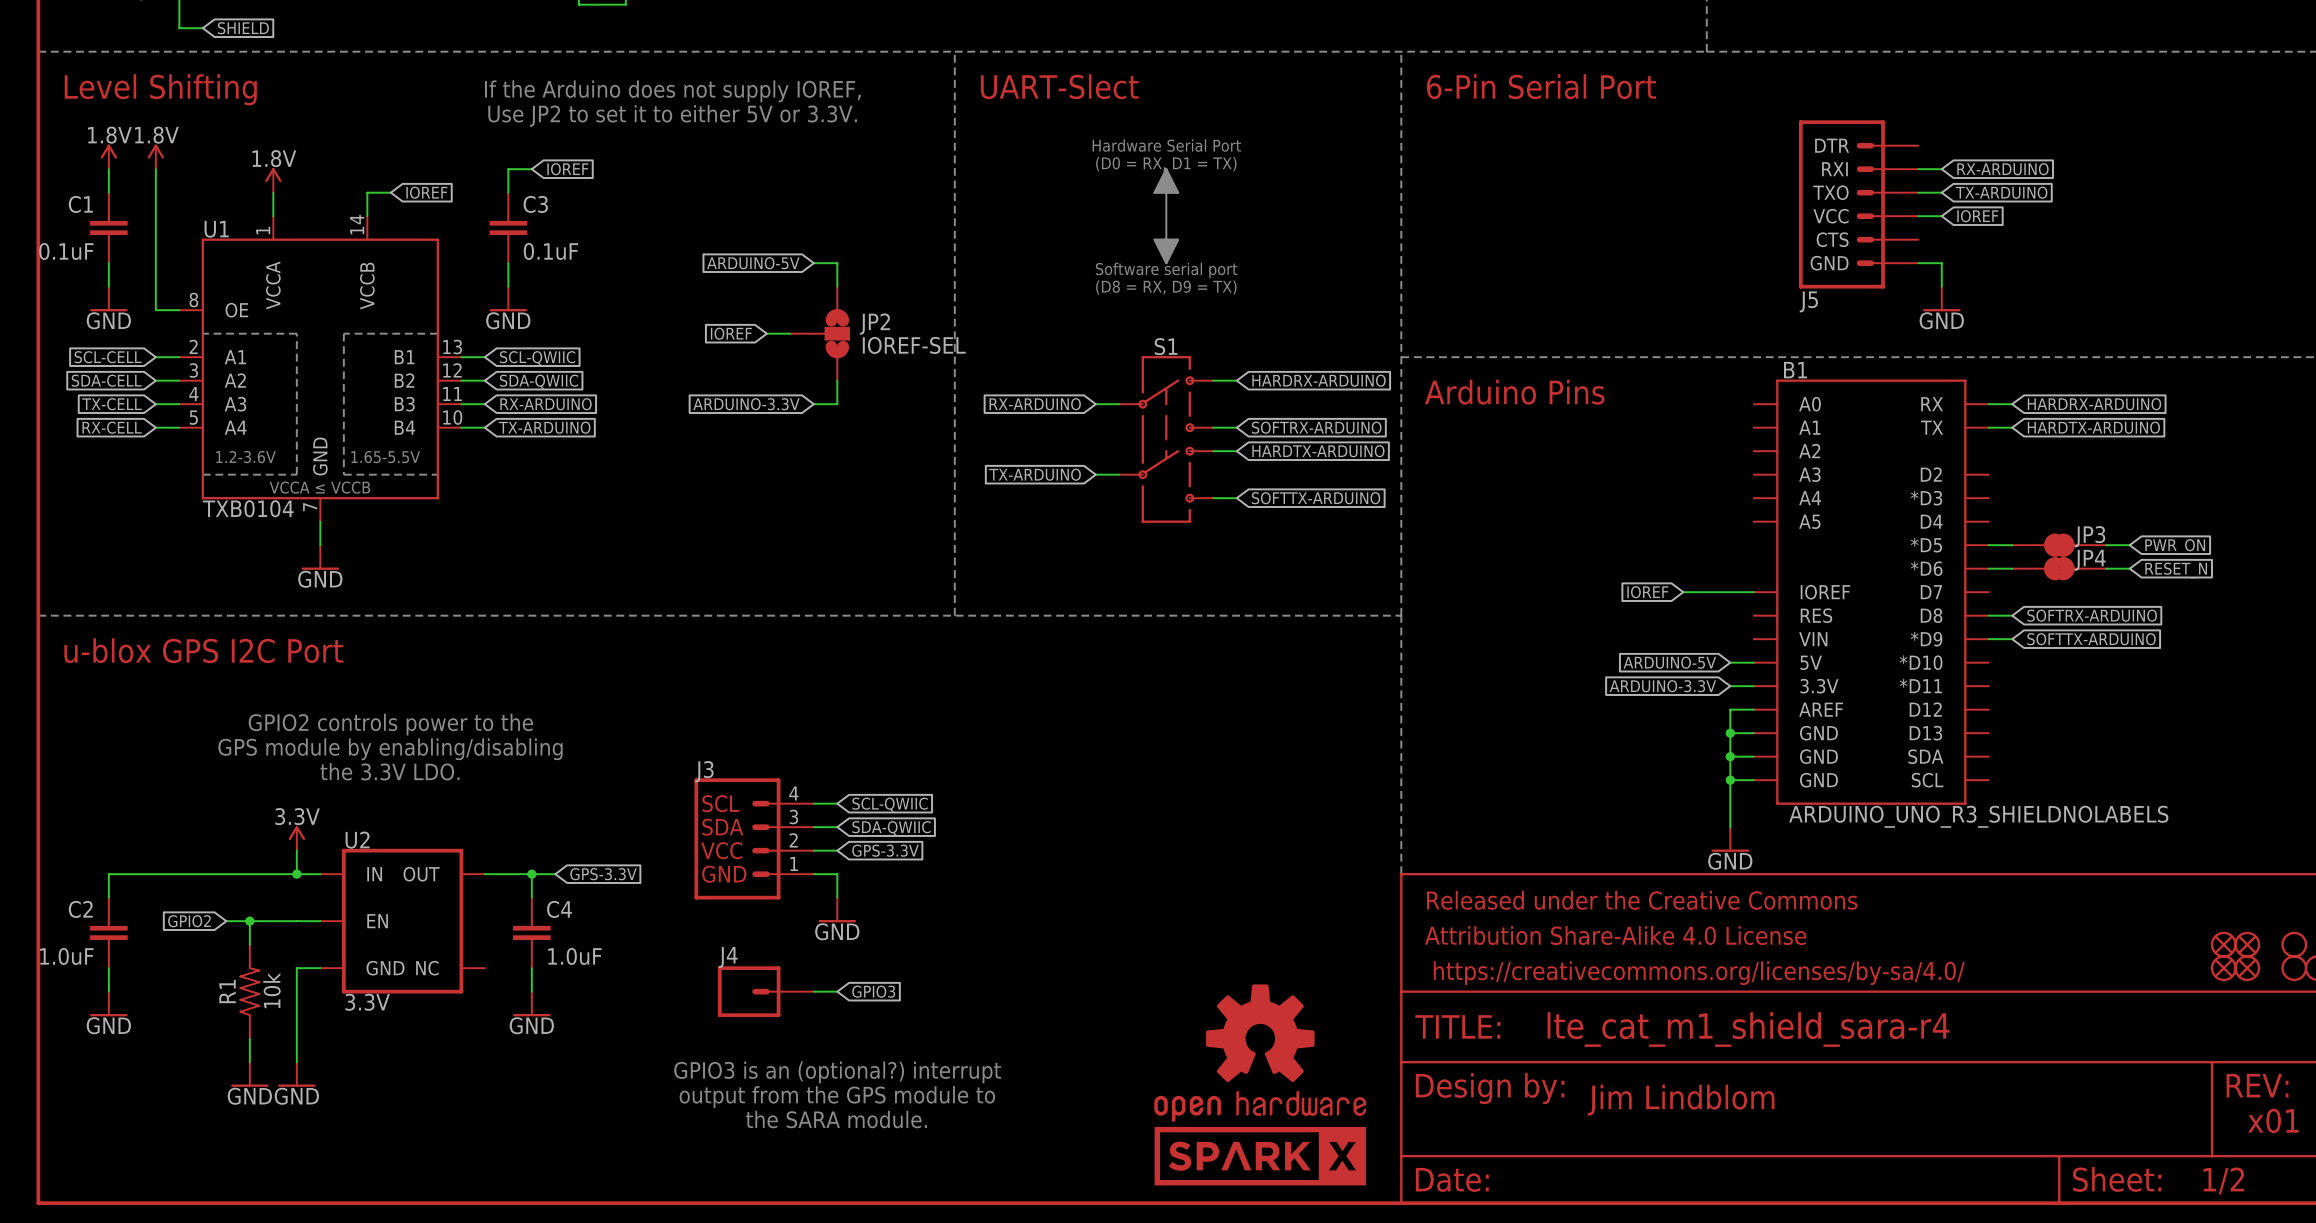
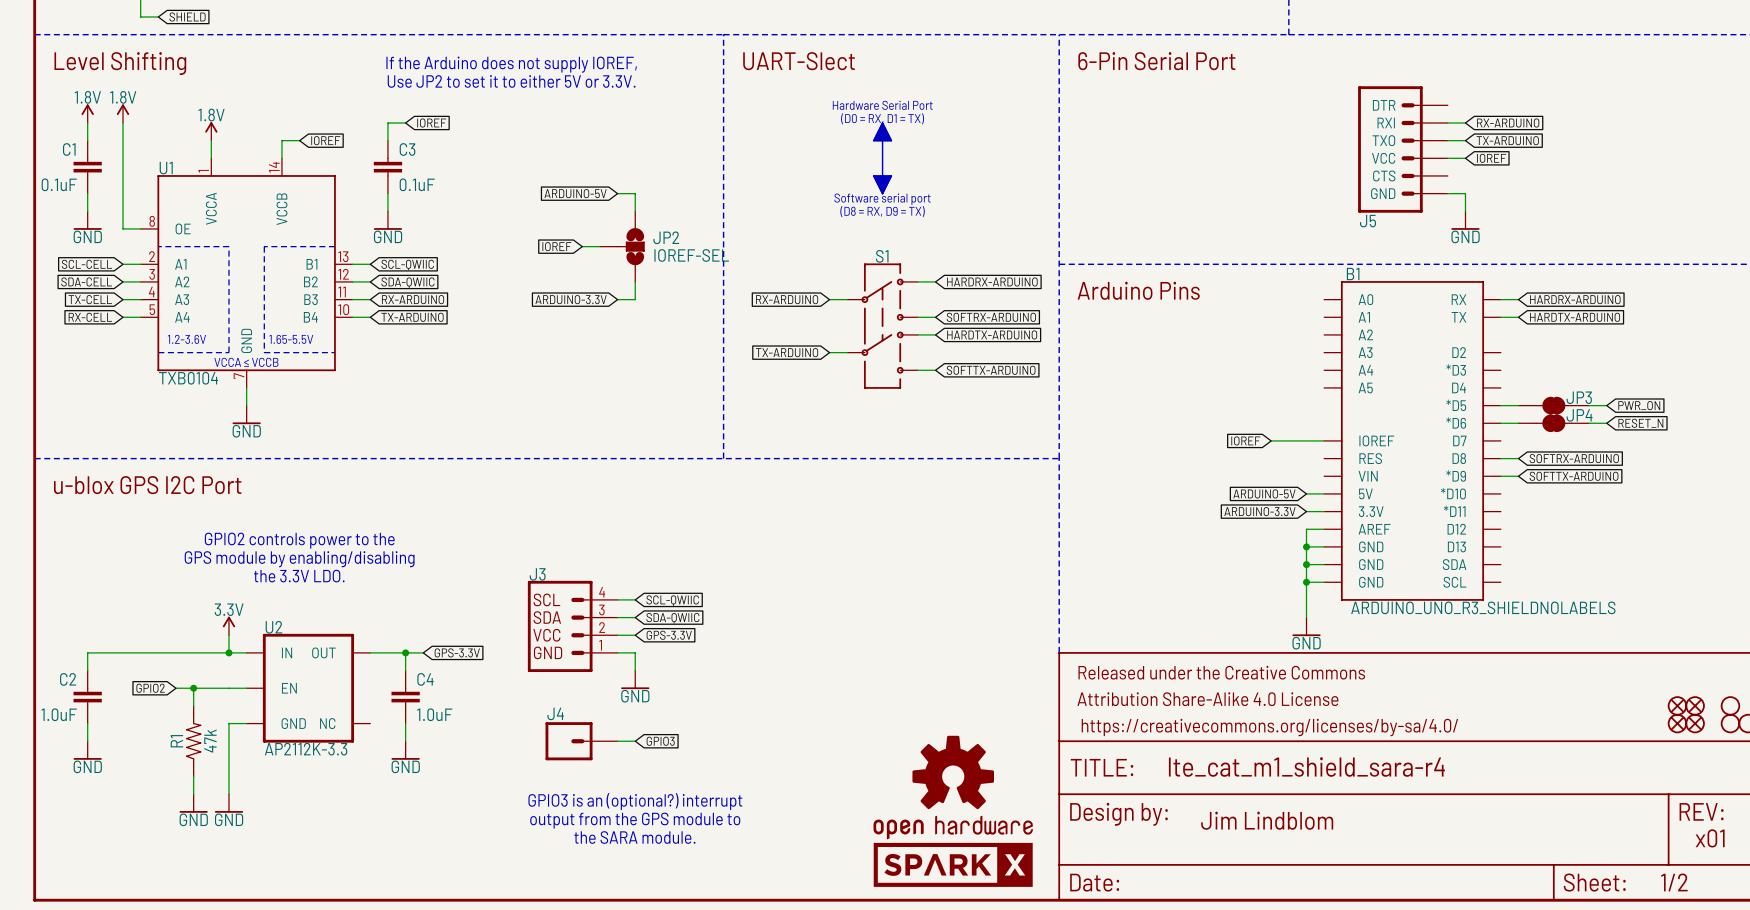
R1 value: 10k (271, 990) -> 47k (210, 741)
U2 value: 3.3V (367, 1002) -> AP2112K-3.3 (306, 749)

